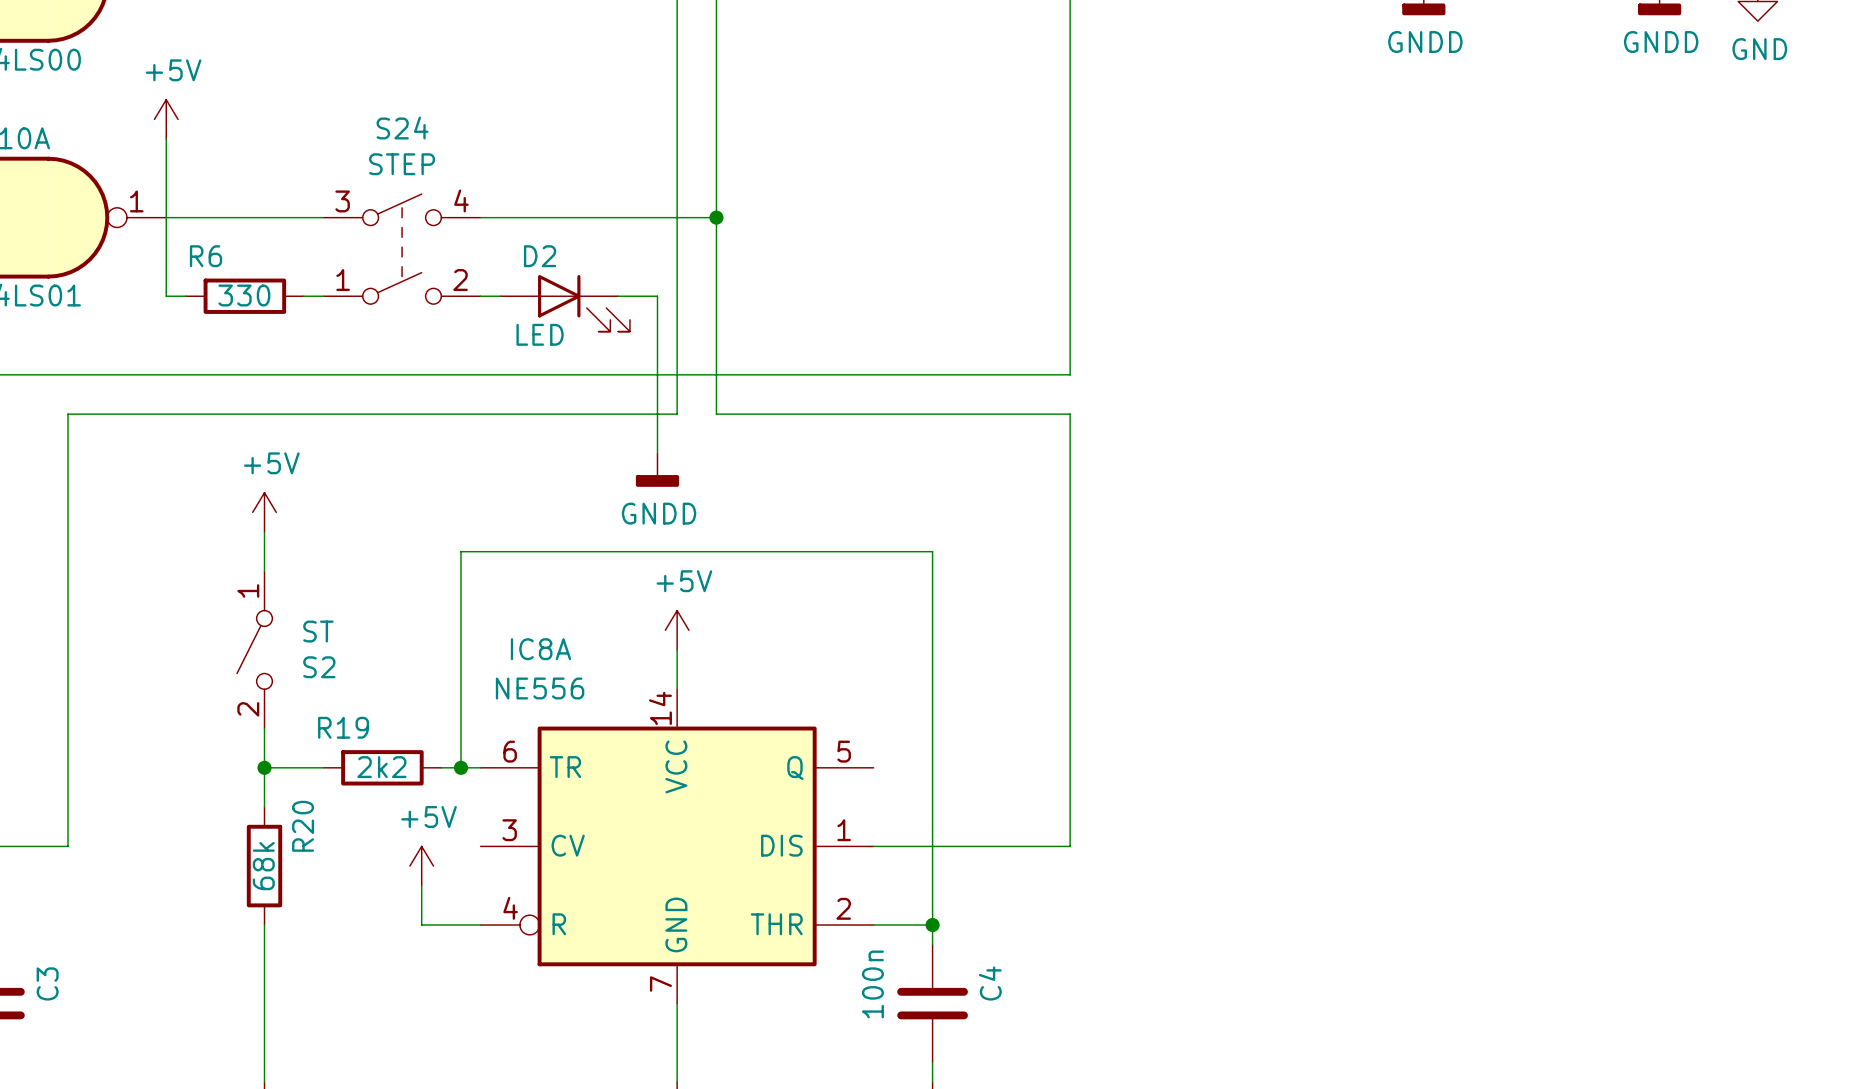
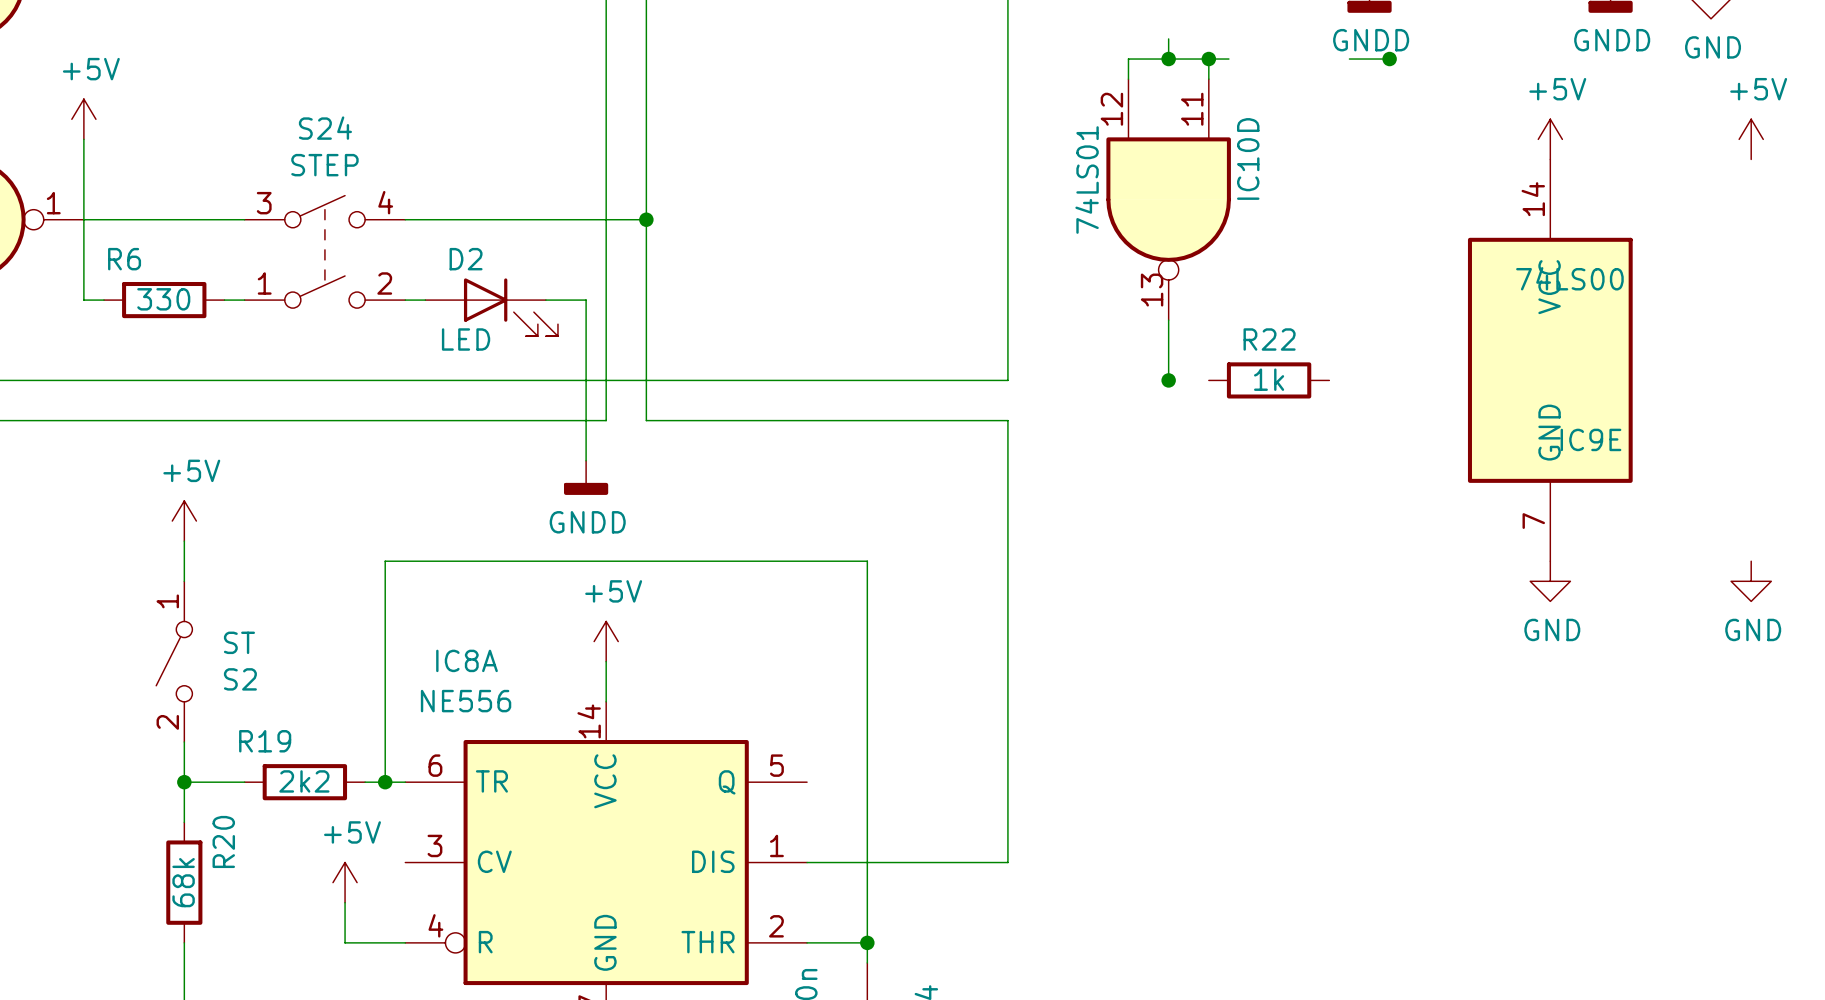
wire: none -> (1168, 38) (1168, 59)
junction: none -> (1168, 59)
wire: none -> (1208, 59) (1208, 79)
junction: none -> (1208, 59)
wire: none -> (1228, 59) (1128, 59) (1128, 79)
wire: none -> (1349, 59) (1389, 59)
junction: none -> (1389, 59)
power symbol: none -> +5V (1550, 139)
power symbol: none -> +5V (1751, 139)
IC10D: none -> 74LS01 (1168, 199)
wire: none -> (1168, 320) (1168, 380)
IC9E: none -> 74LS00 (1550, 360)
junction: none -> (1168, 380)
R22: none -> 1k (1269, 380)
power symbol: none -> GND (1550, 581)
power symbol: none -> GND (1751, 581)

